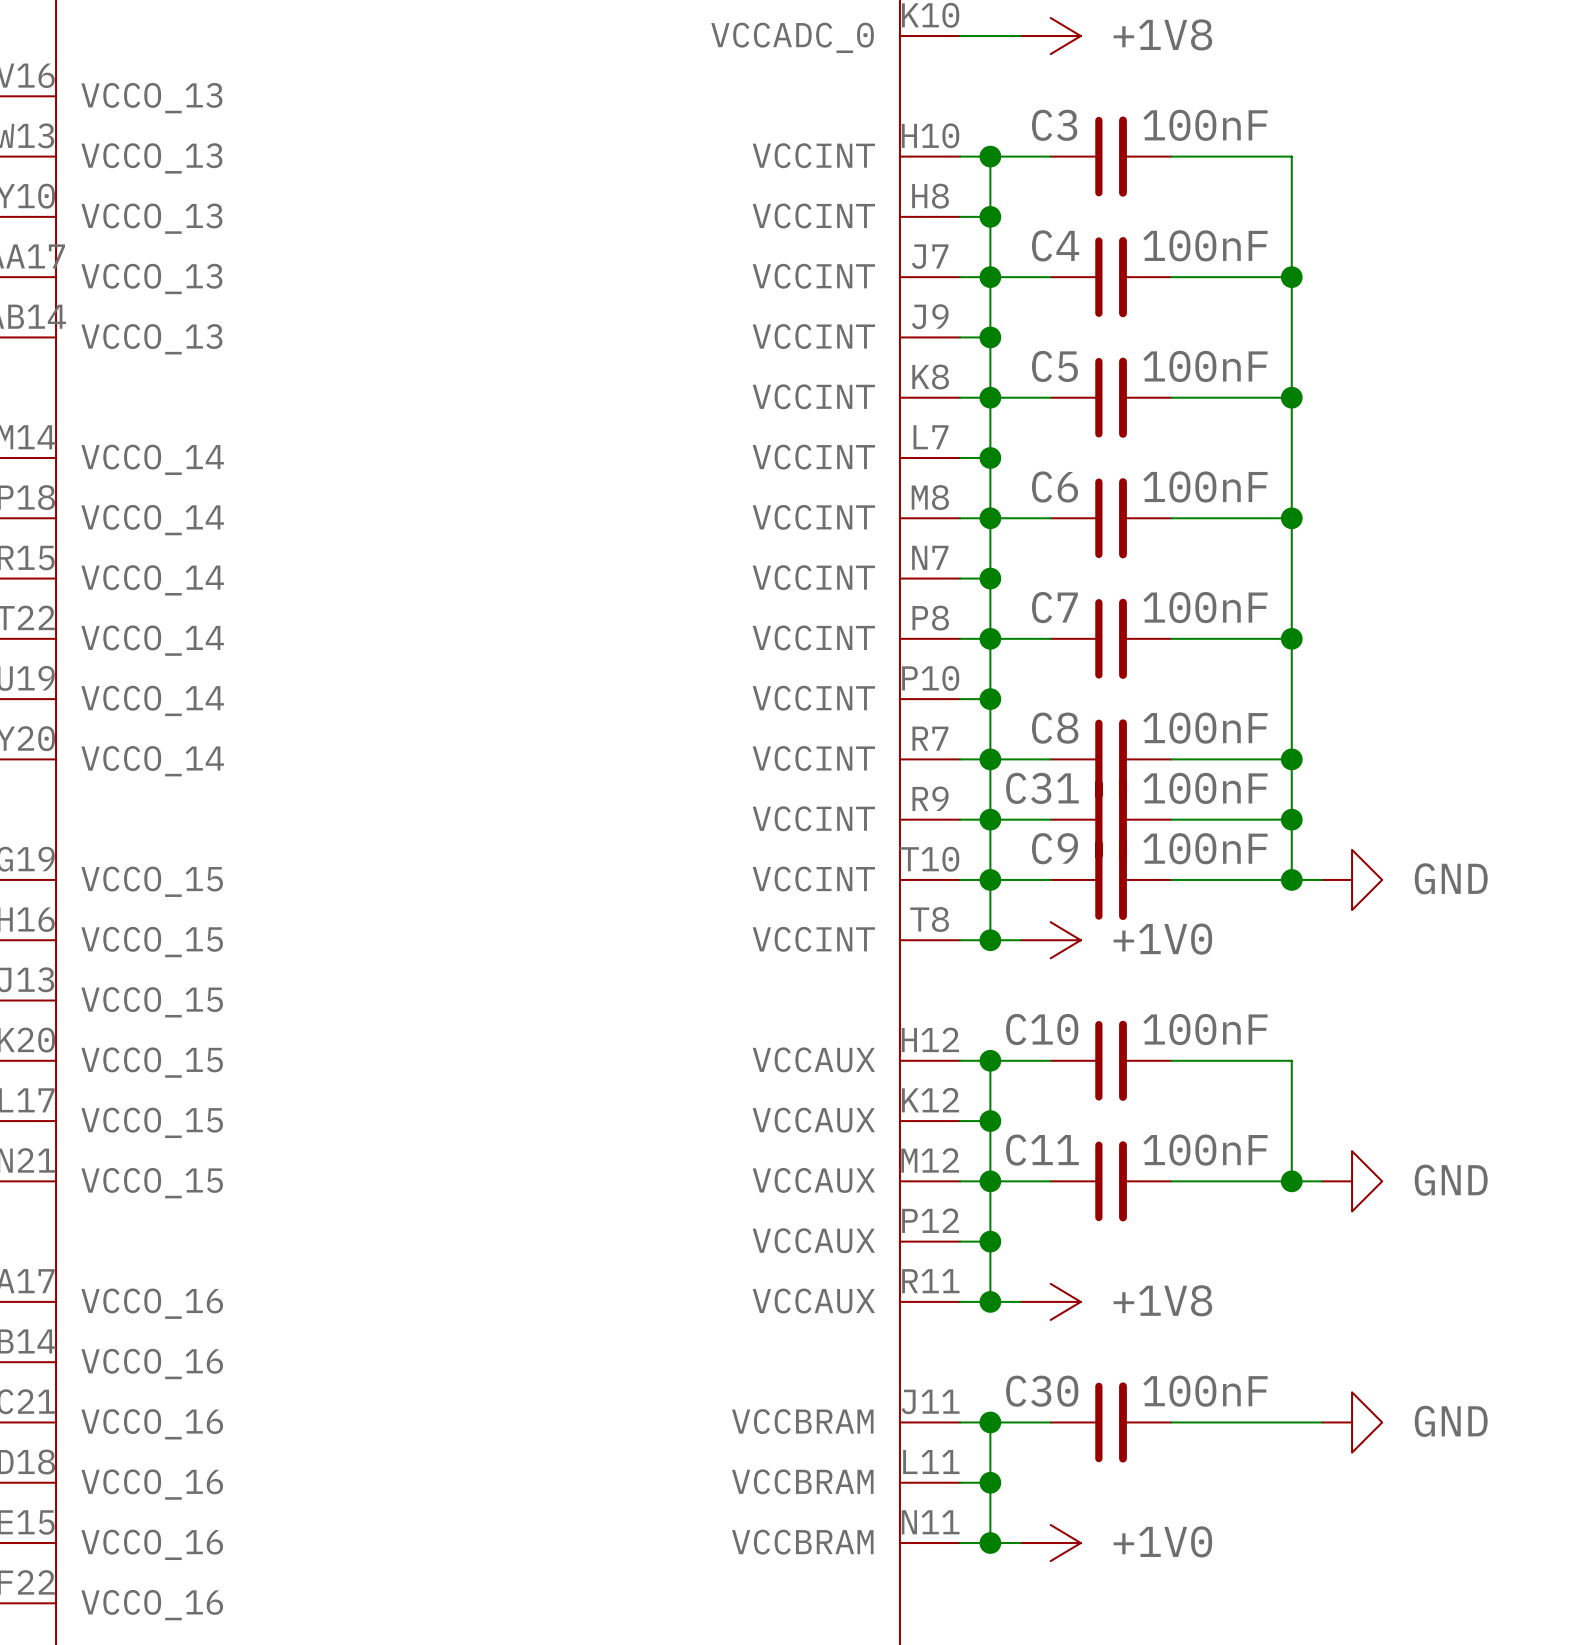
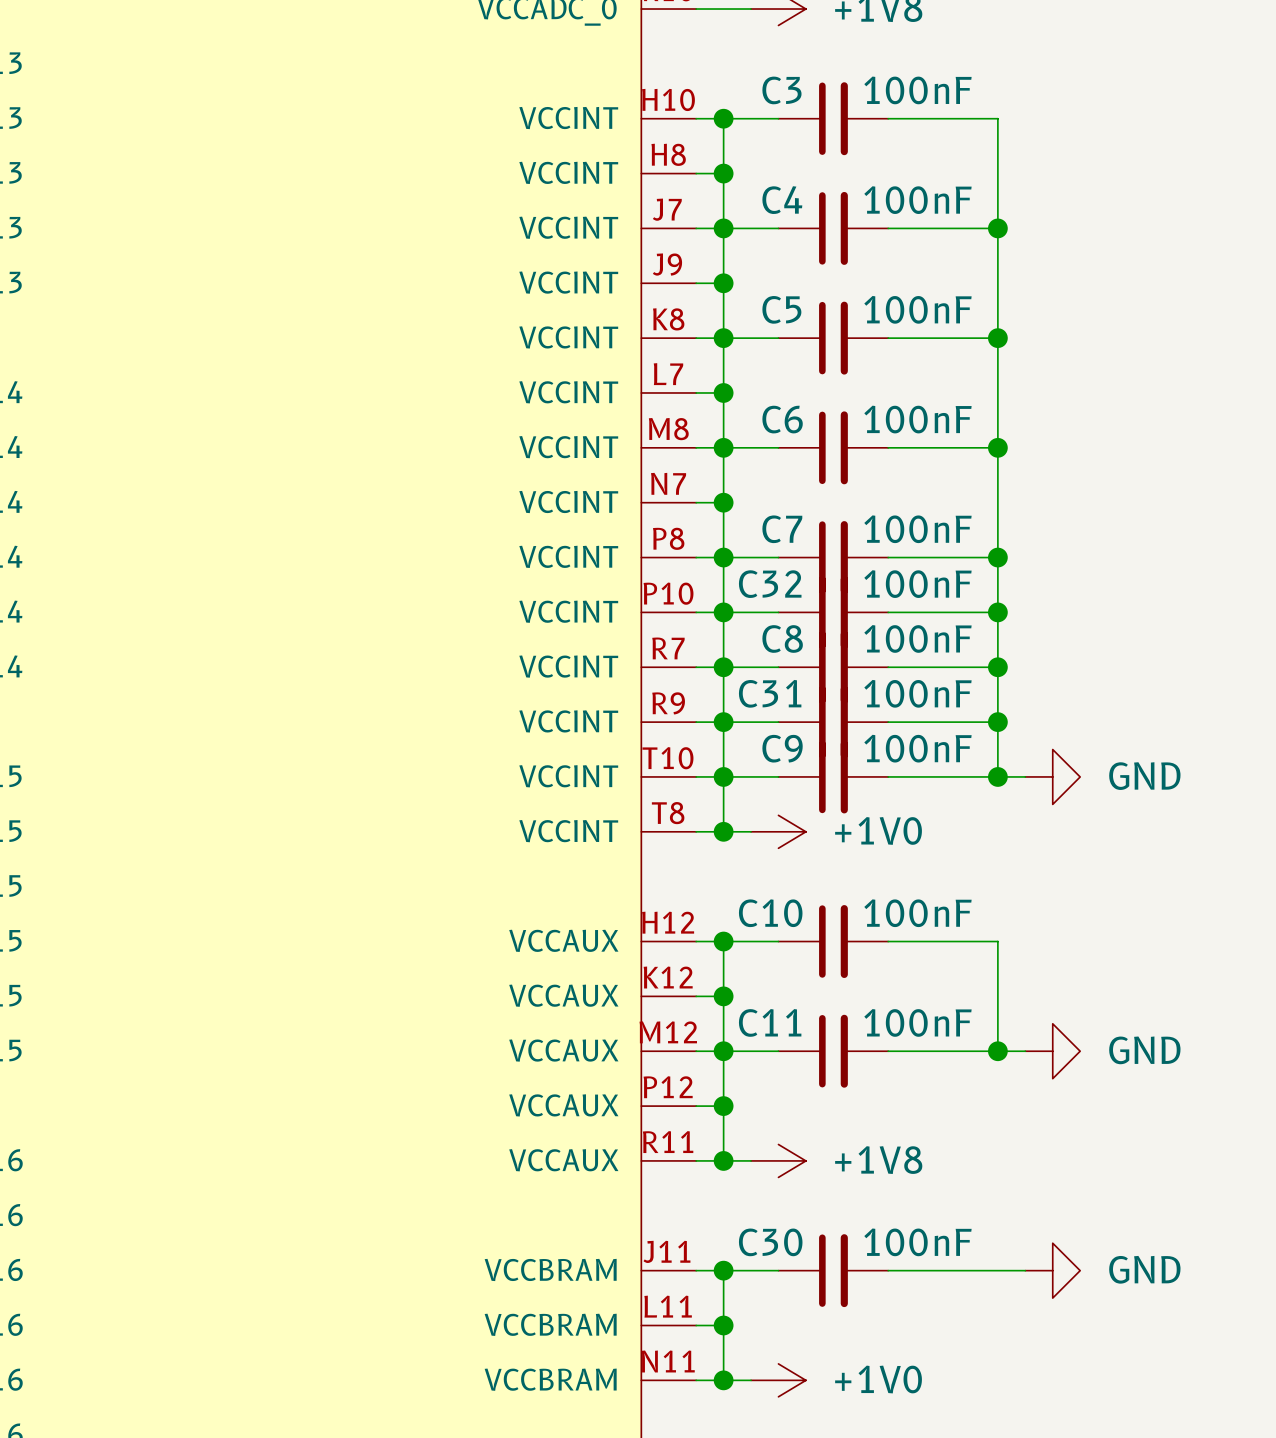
wire: none -> (723, 612) (778, 612)
C32: none -> 100nF (833, 612)
wire: none -> (888, 612) (997, 612)
junction: none -> (997, 612)

